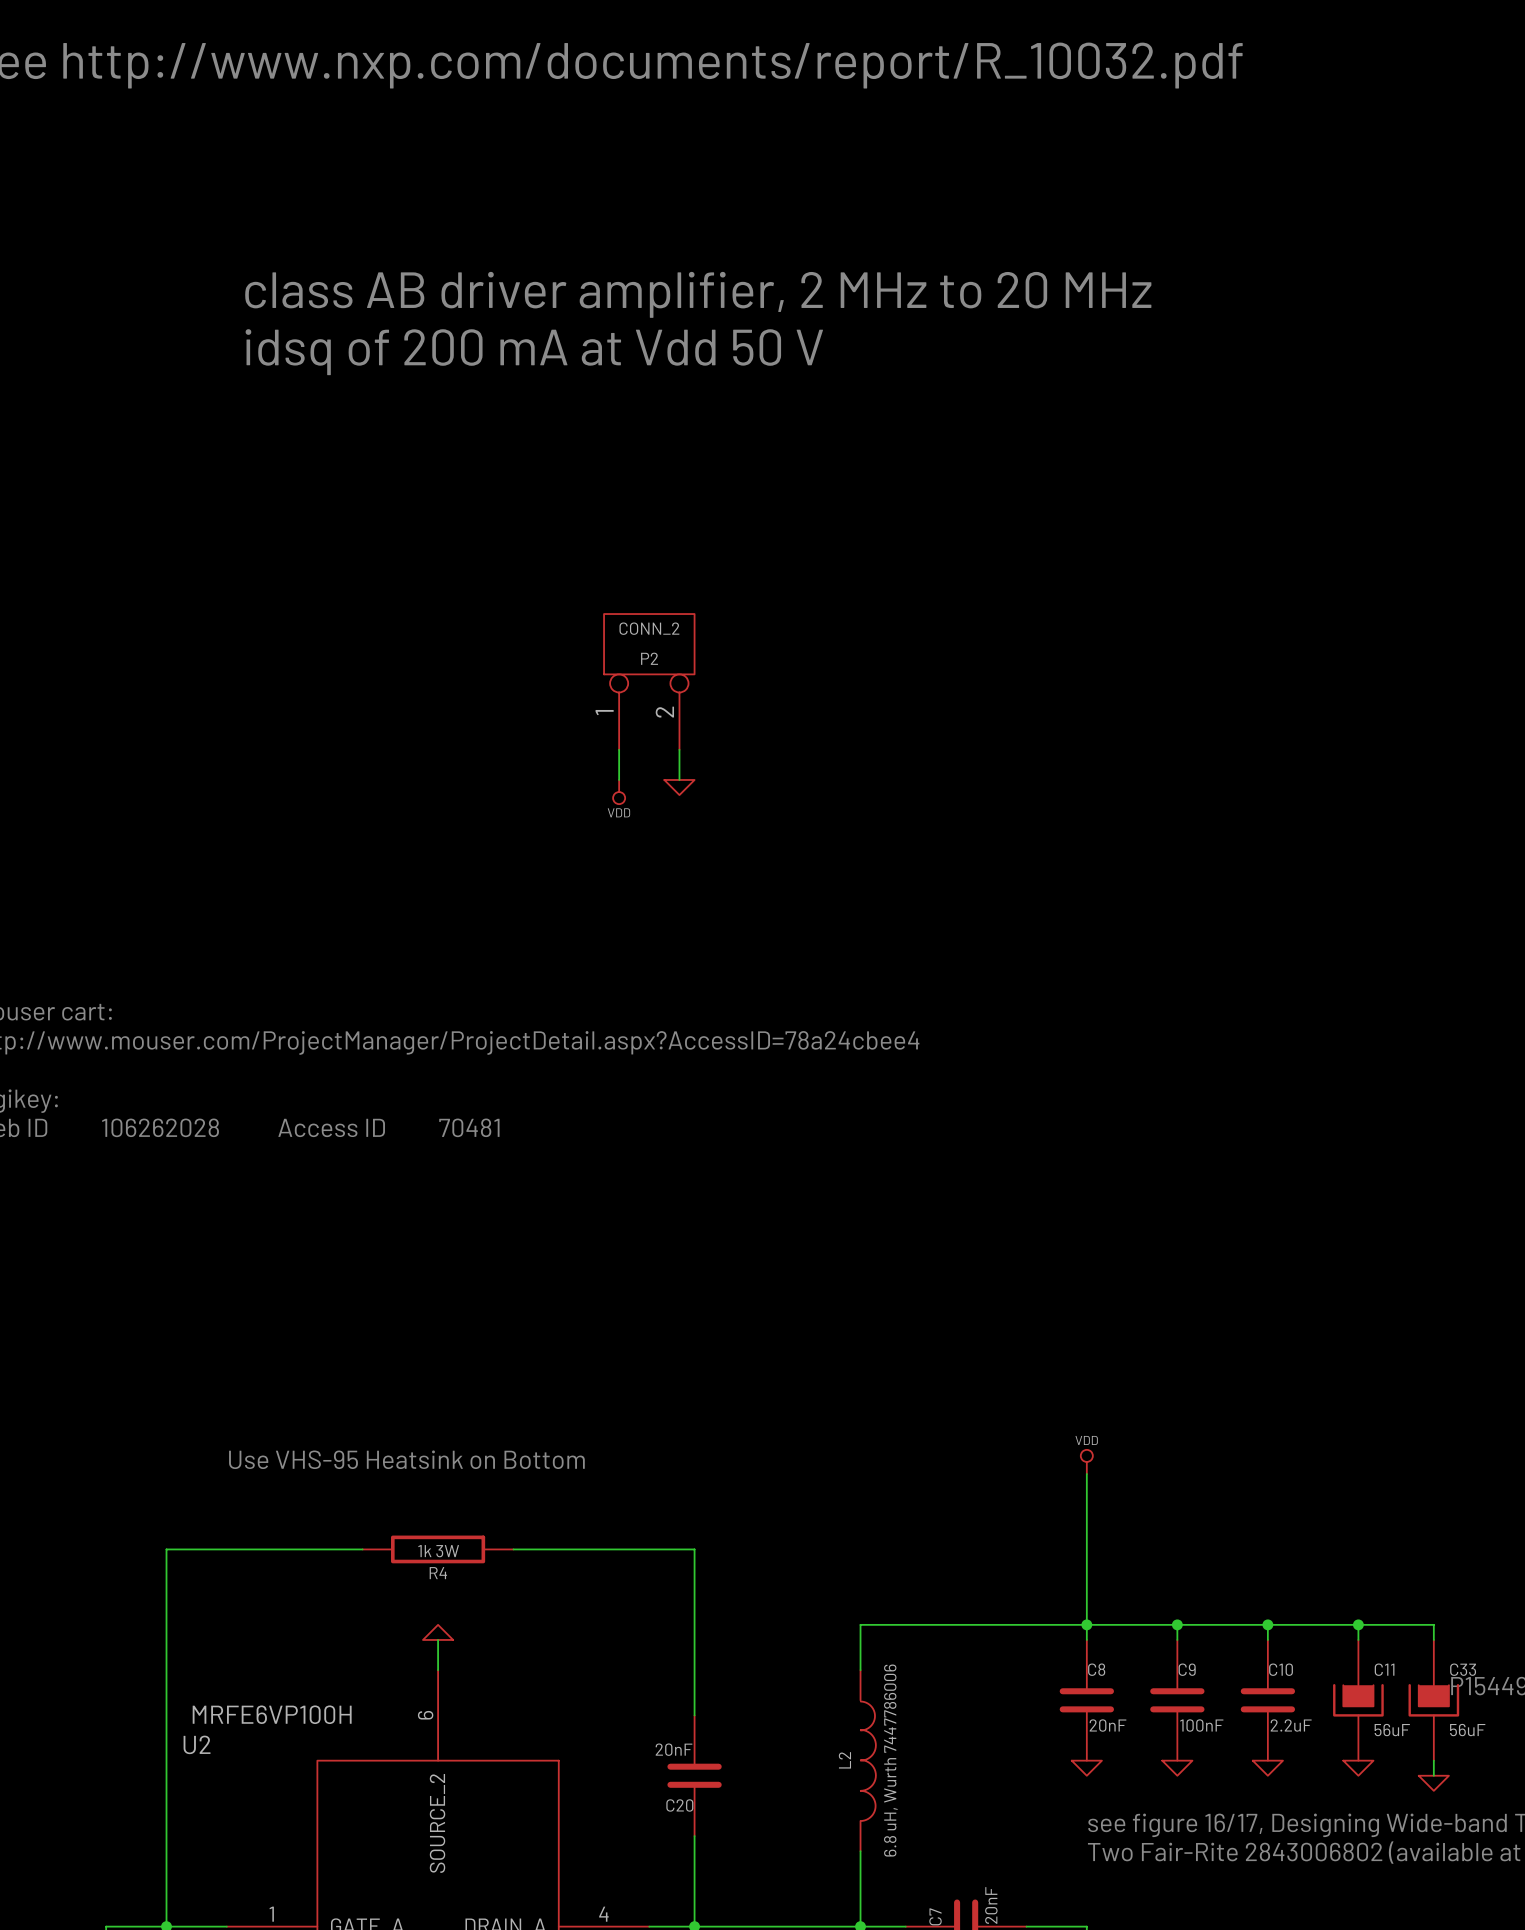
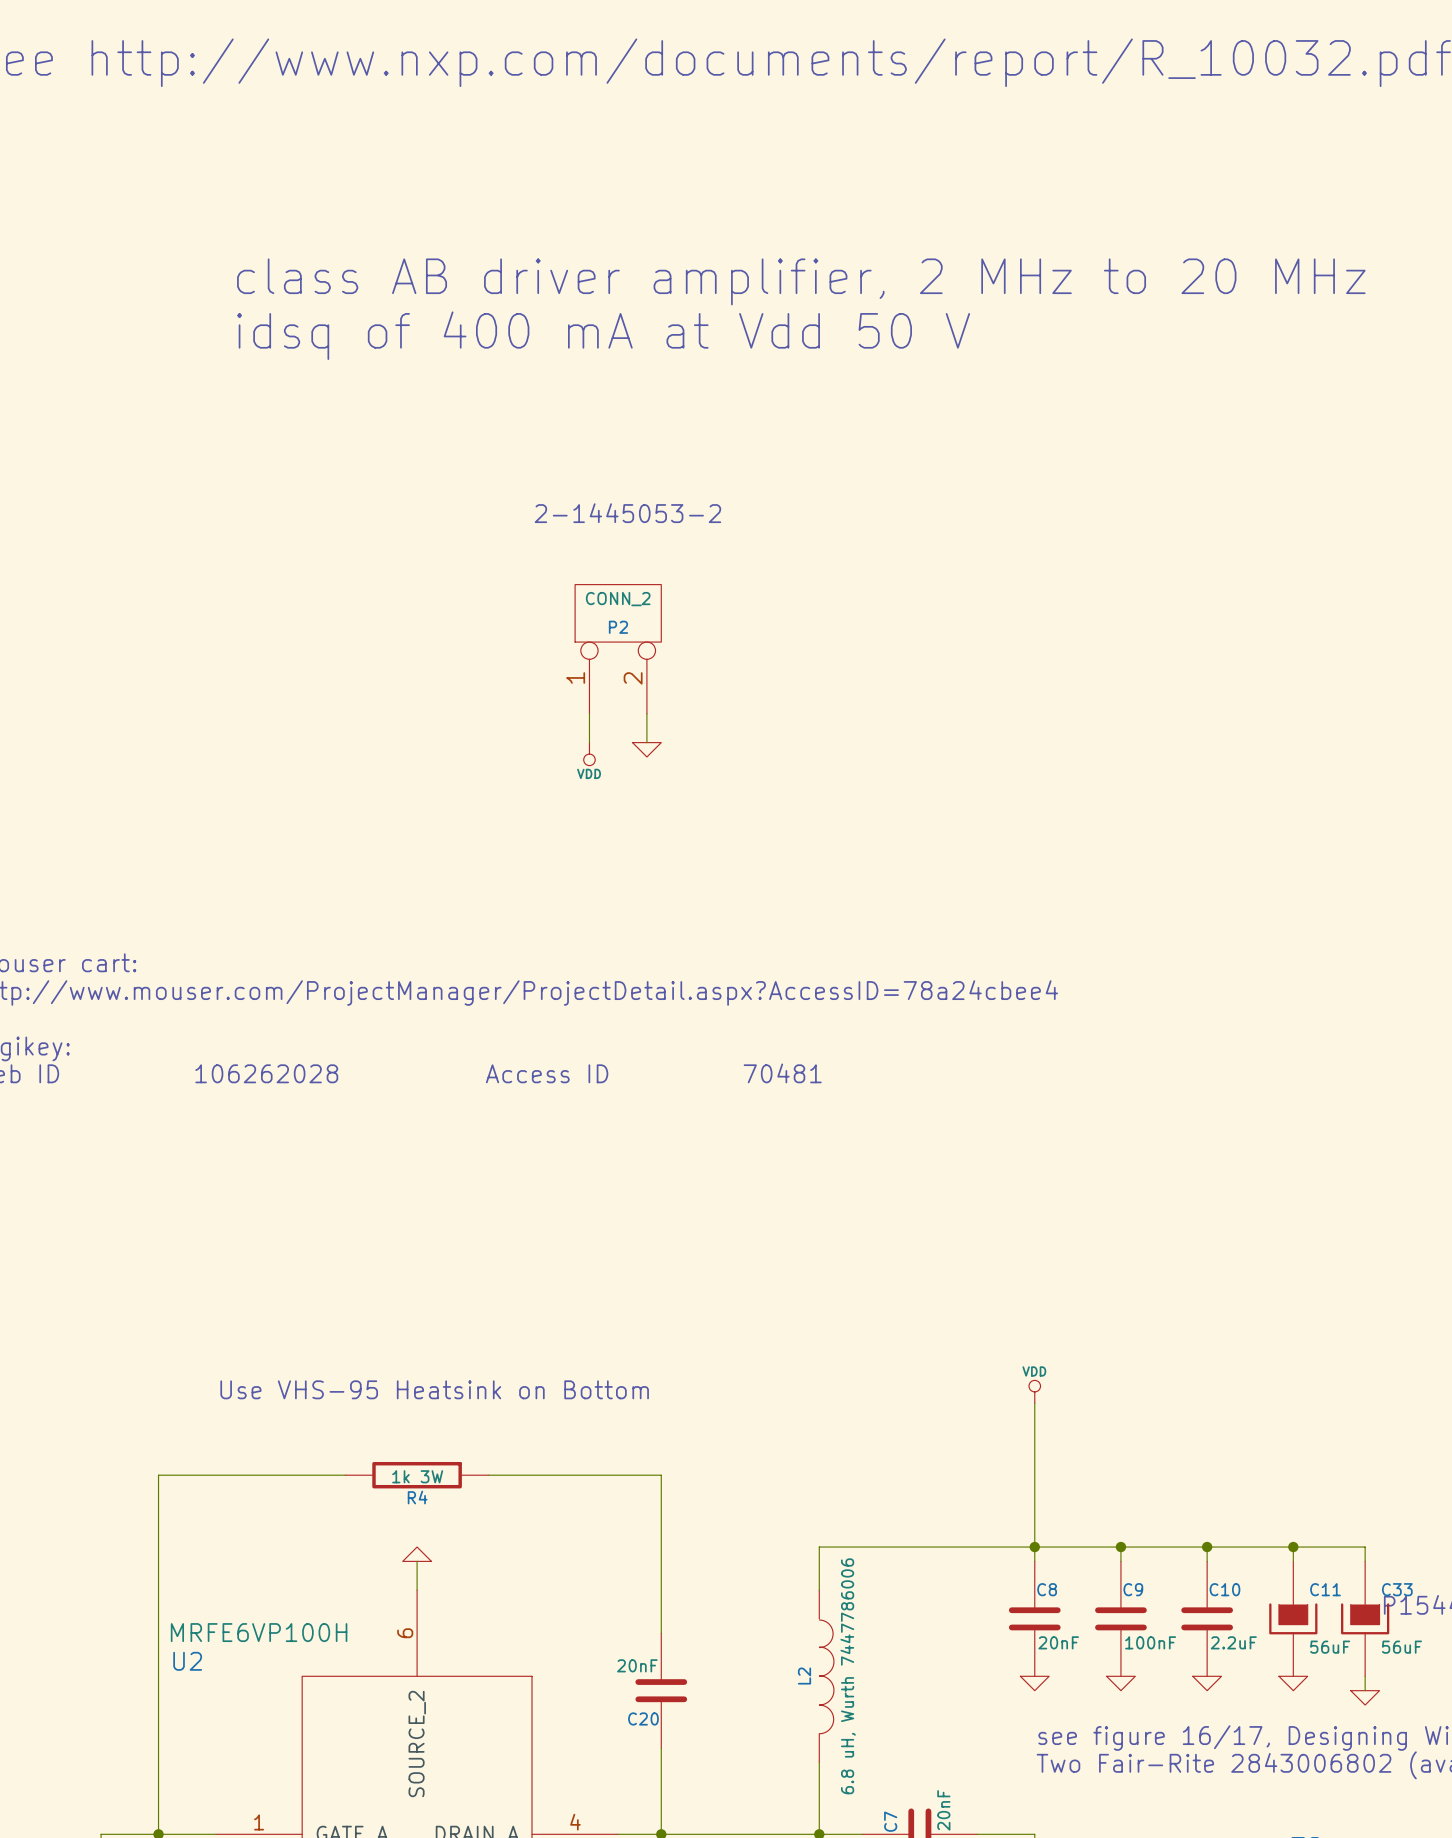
text: idsq of 200 mA at Vdd 50 V (534, 352) -> idsq of 400 mA at Vdd 50 V (603, 335)
text: none -> 2-1445053-2 (627, 513)

